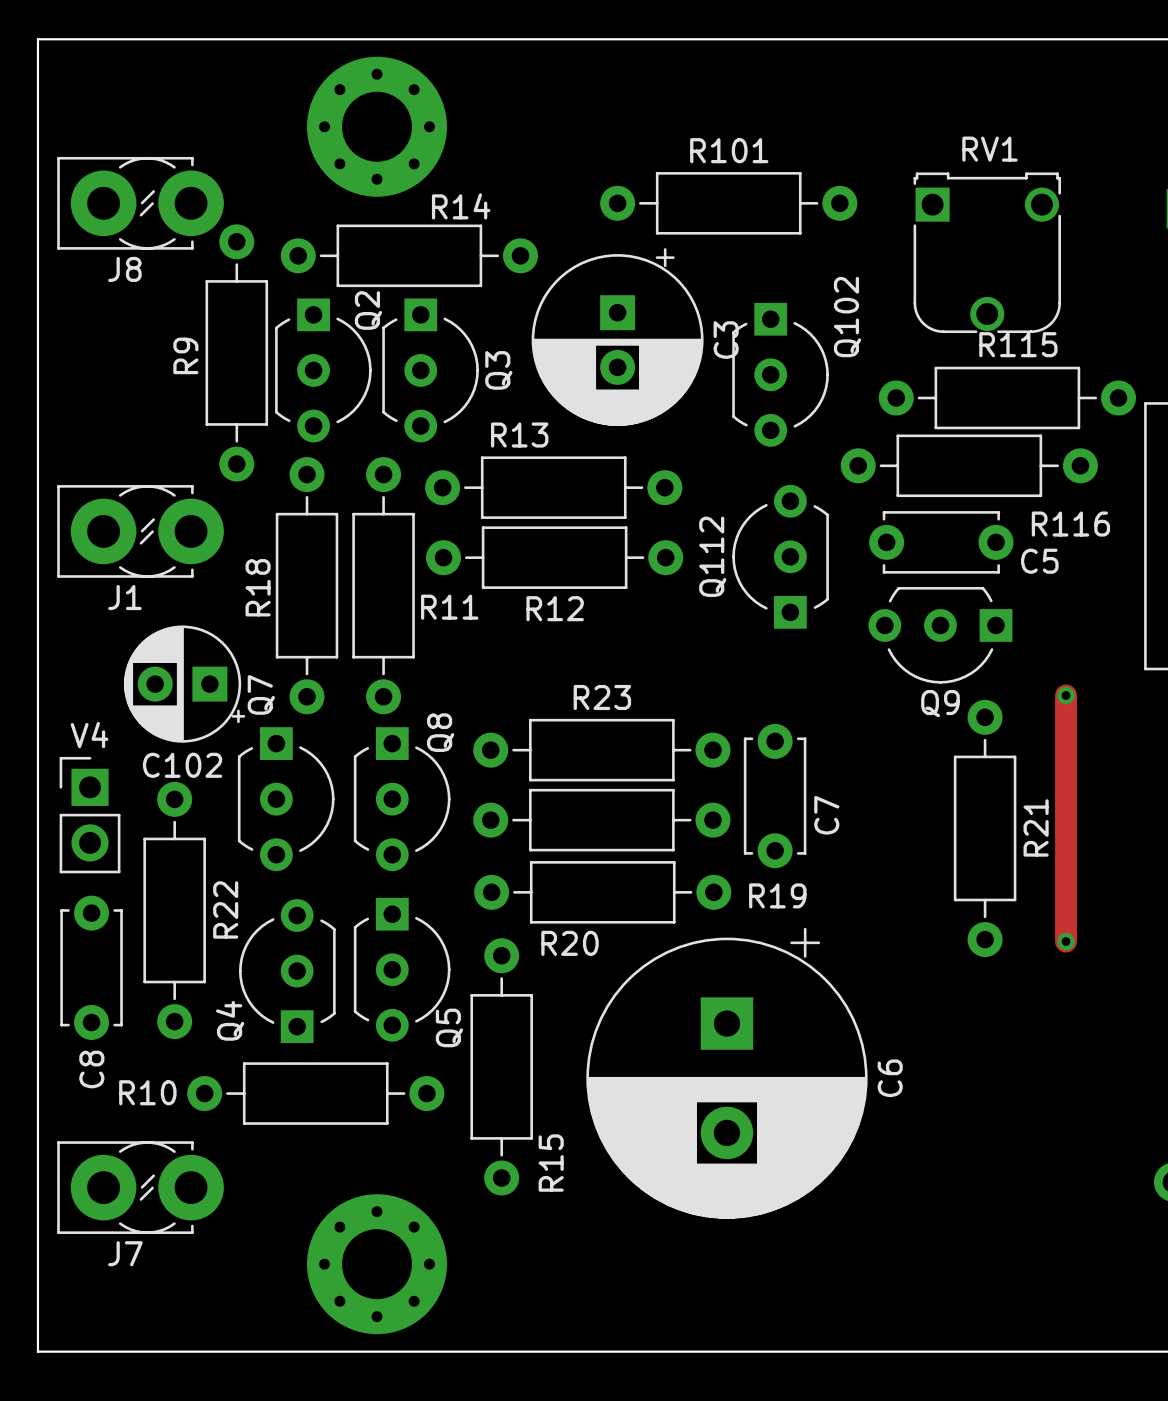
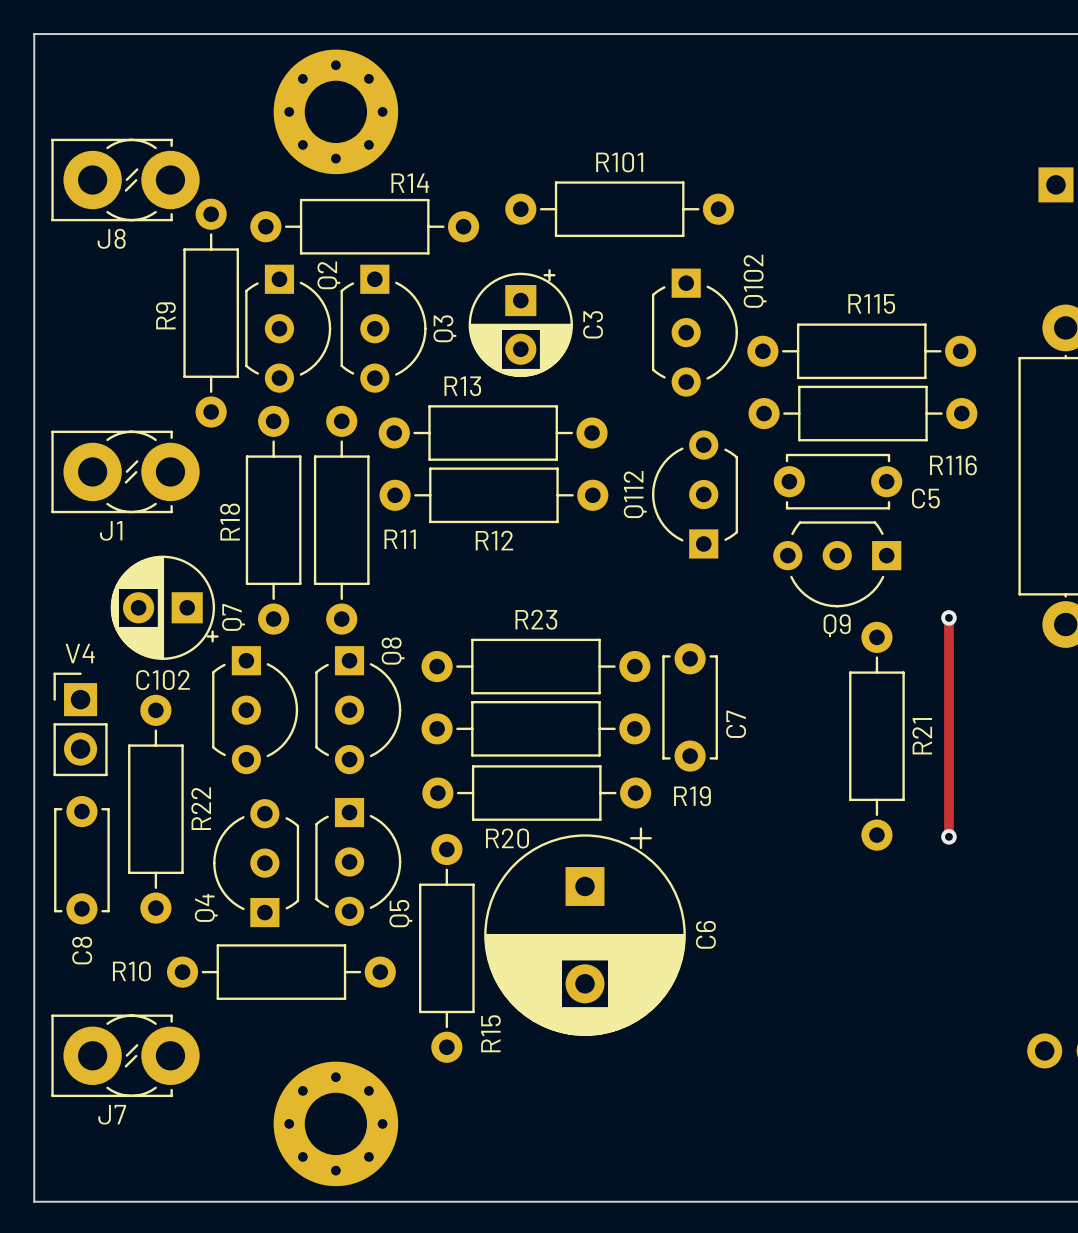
R101 position: (728, 203) -> (619, 209)
C3 footprint: [531, 248, 704, 426] -> [468, 269, 573, 378]
RV1: (987, 252) -> none
R115 position: (1007, 397) -> (861, 351)
track width: thick (1066, 695) (1066, 941) -> thin (948, 617) (948, 836)
C6 footprint: [586, 927, 868, 1219] -> [484, 827, 686, 1036]

